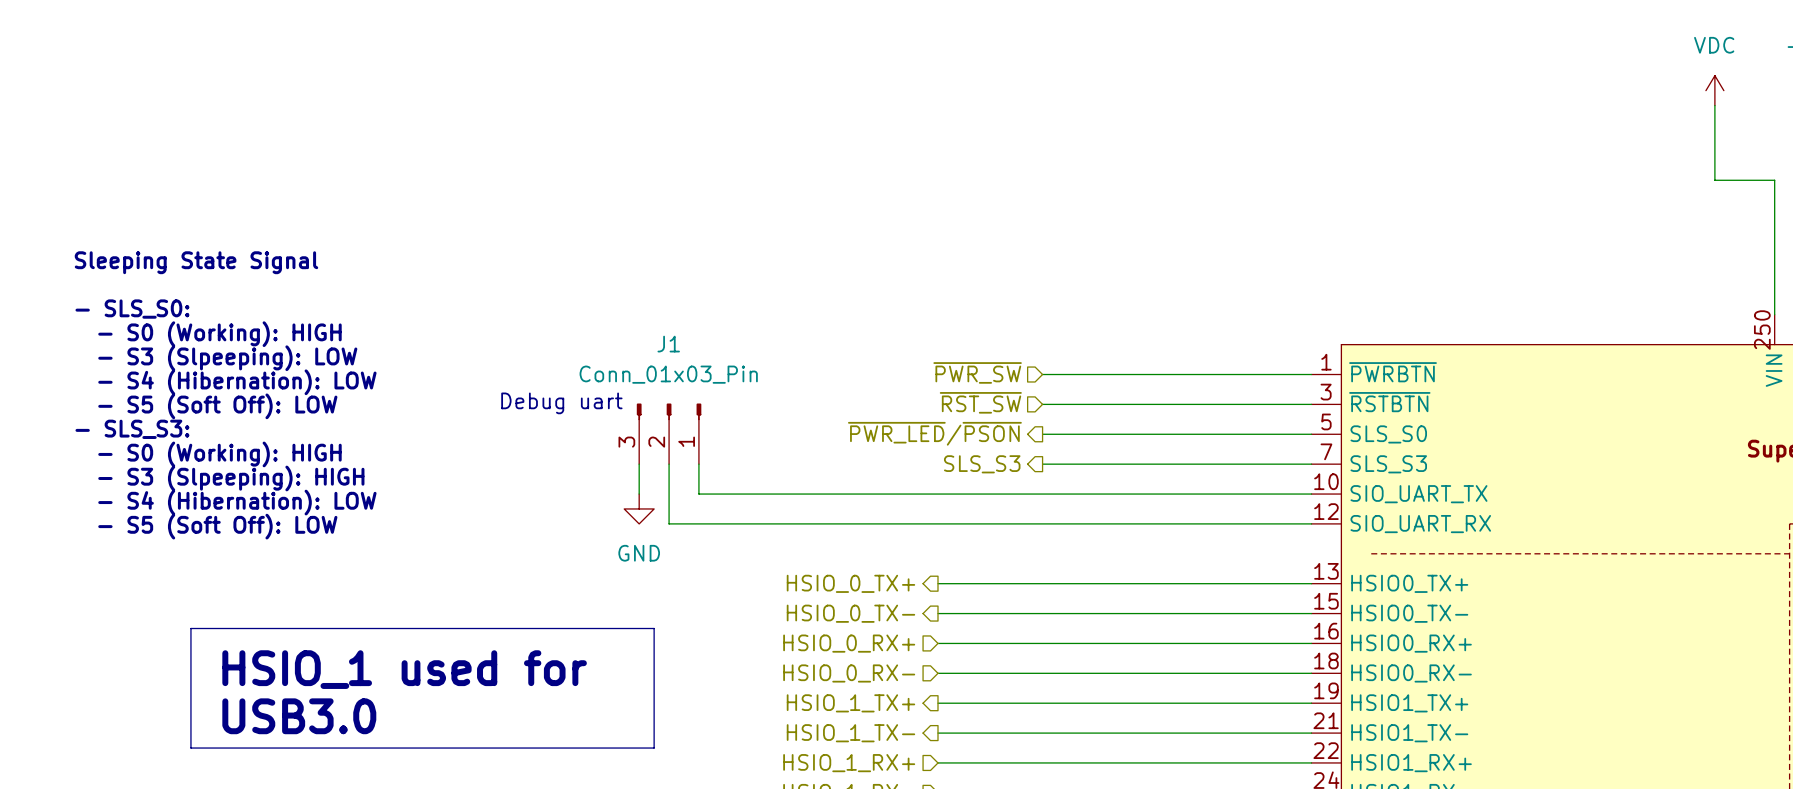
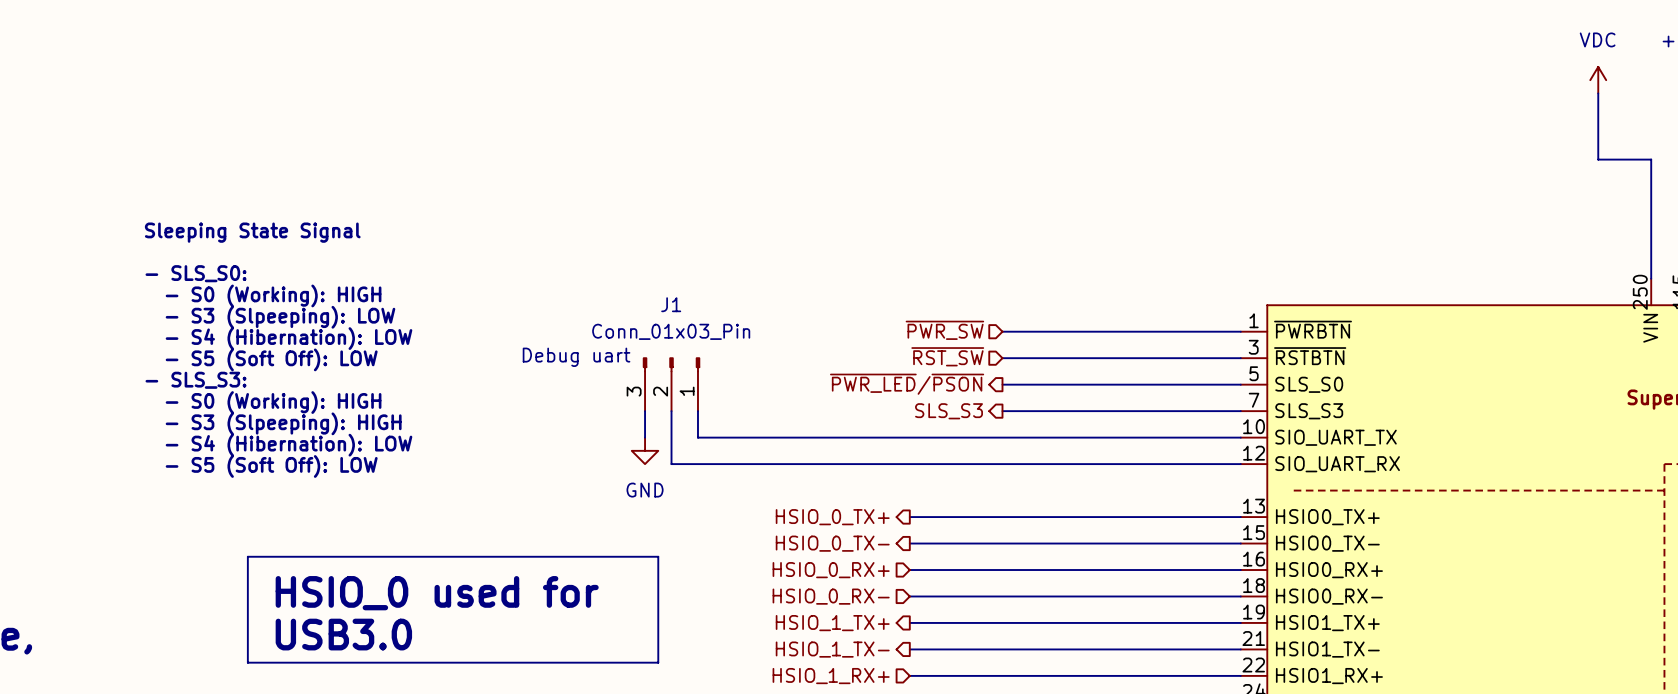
text: HSIO_1 used for (404, 669) -> HSIO_0 used for (437, 593)

